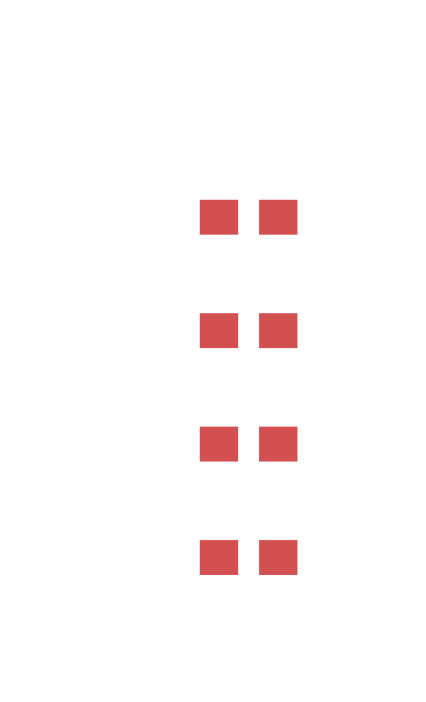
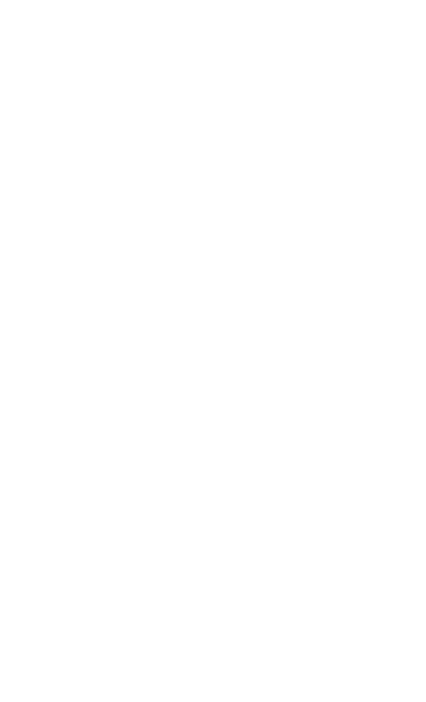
part: (248, 217) -> none
part: (248, 330) -> none
part: (248, 444) -> none
part: (248, 557) -> none

